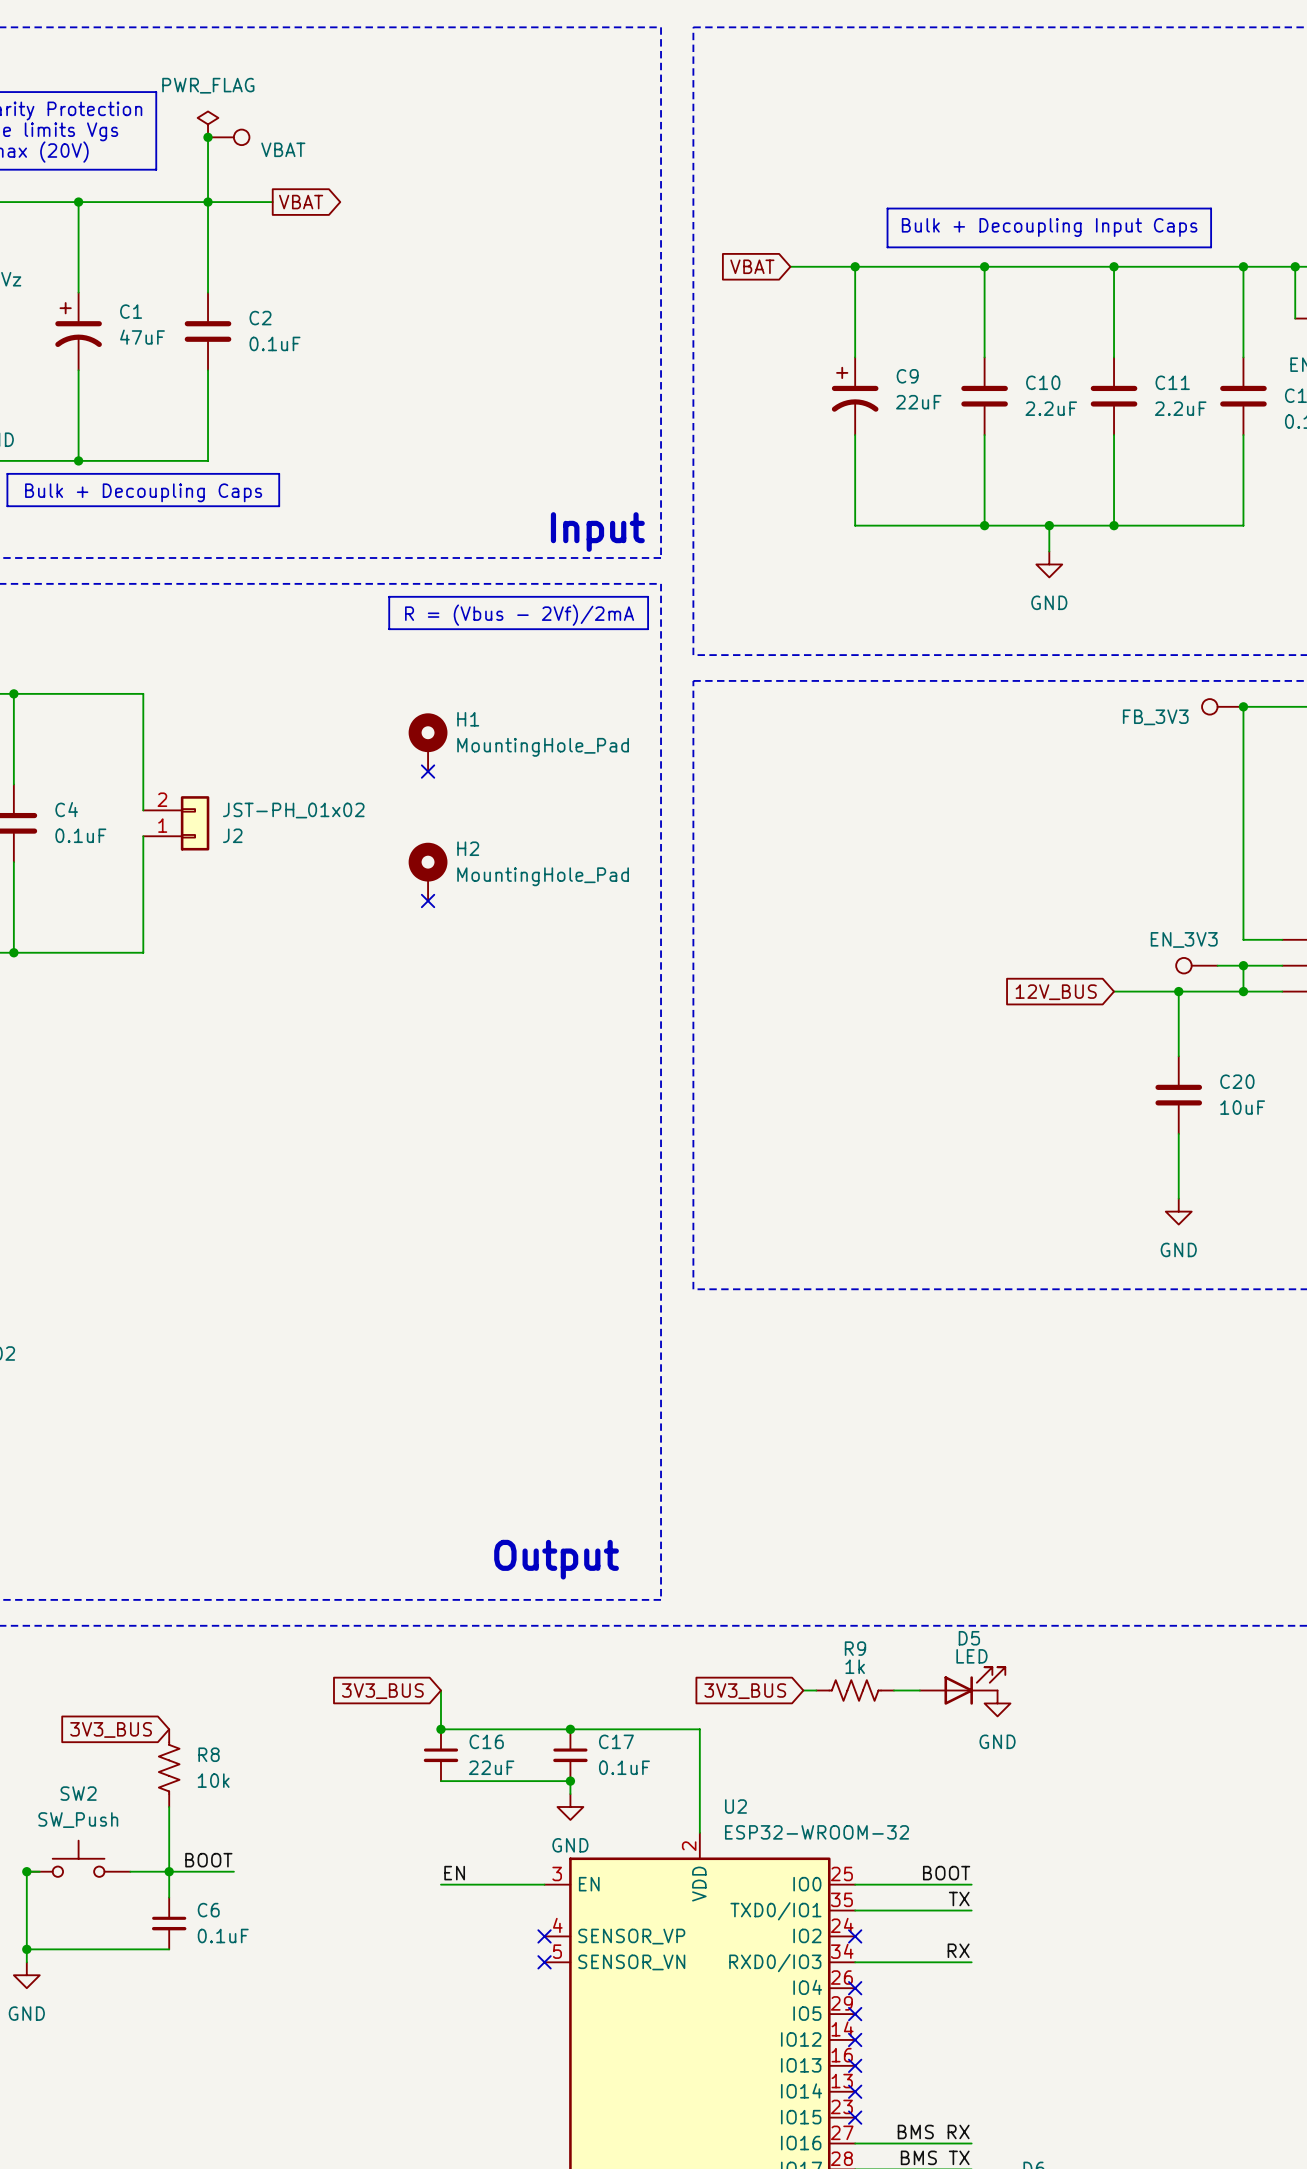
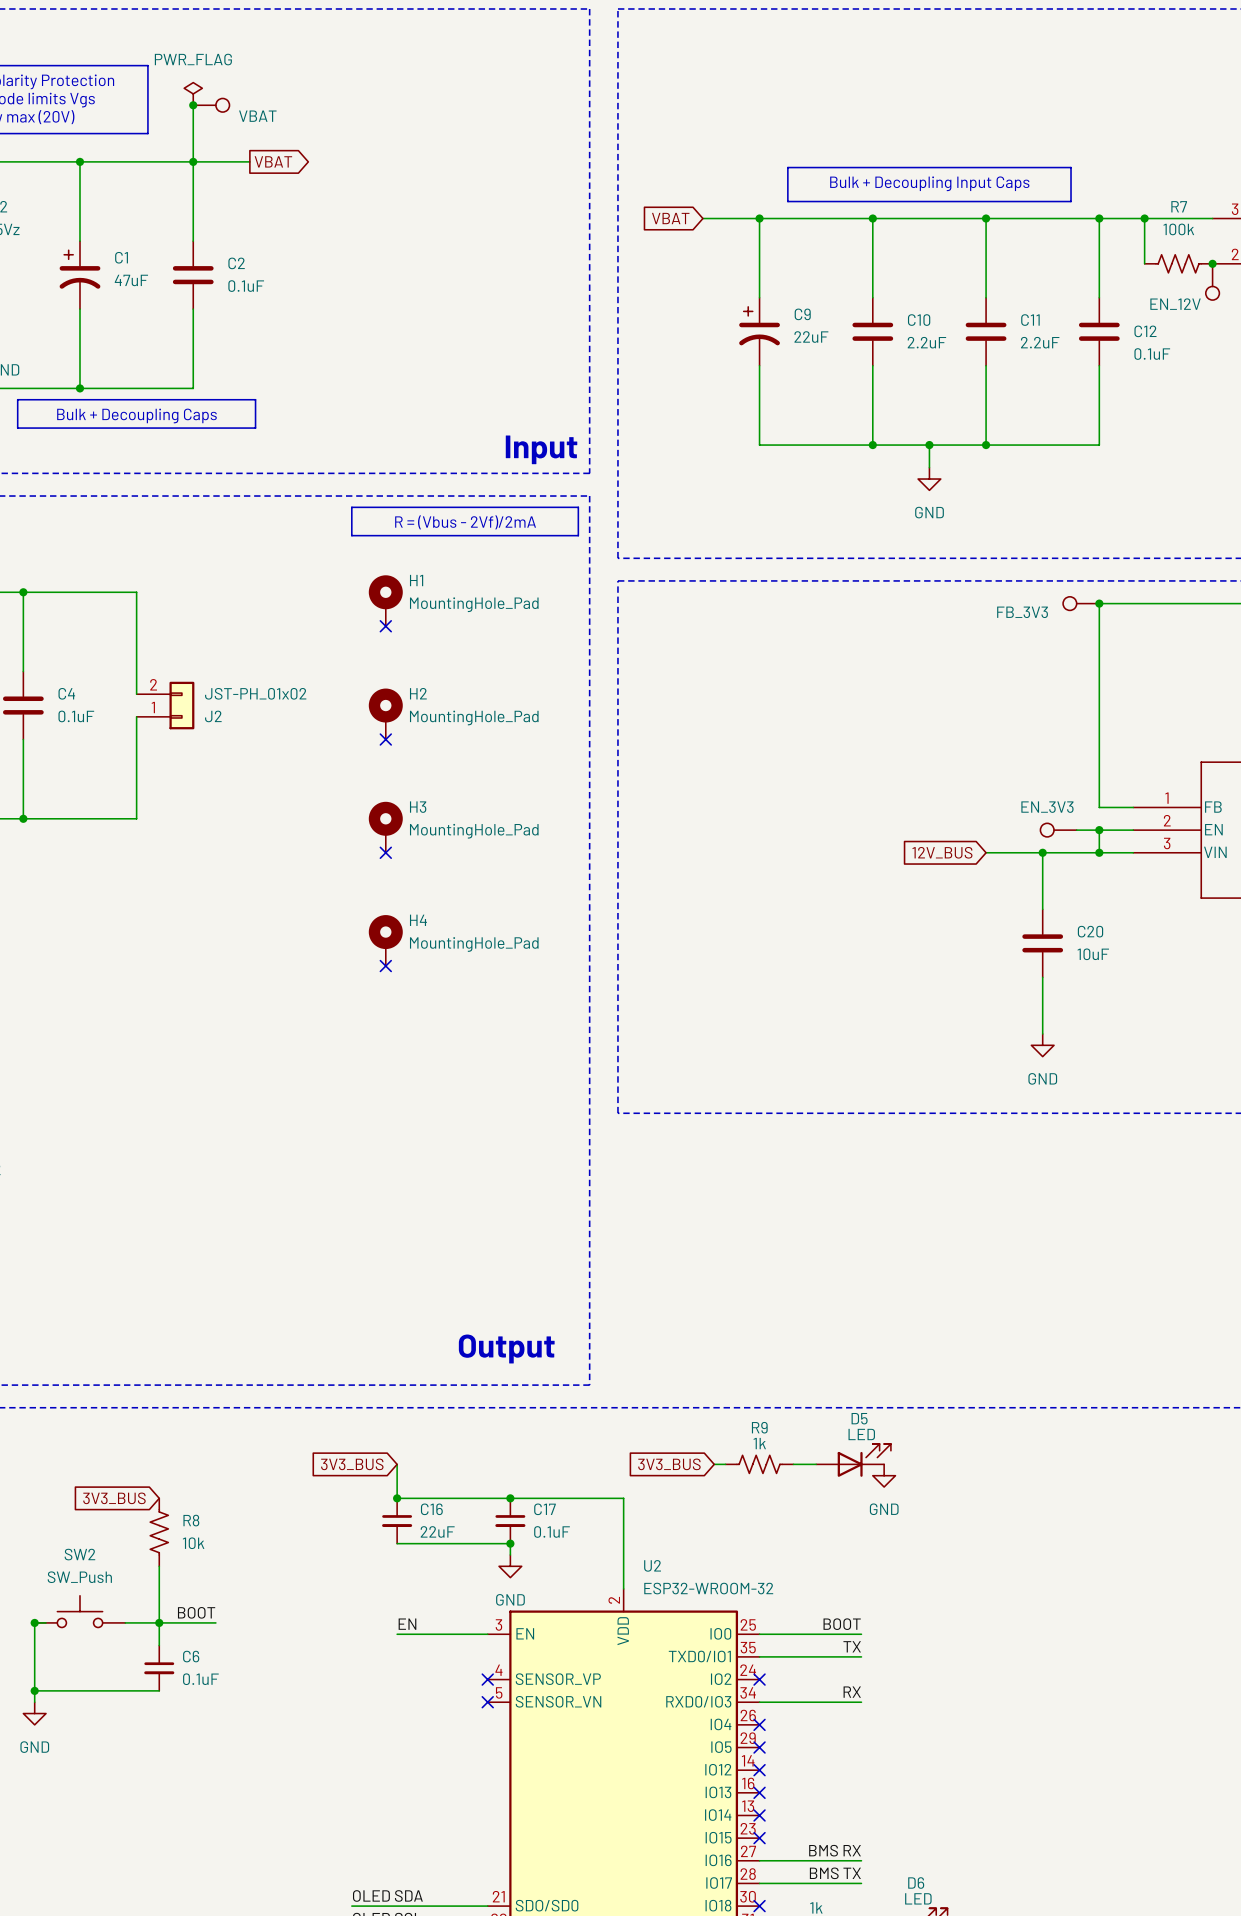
H1 position: (428, 742) -> (385, 600)
no-connect mark position: (428, 771) -> (385, 626)
H2 position: (428, 871) -> (385, 714)
no-connect mark position: (428, 900) -> (385, 739)
H3: none -> MountingHole_Pad (385, 827)
no-connect mark: none -> (385, 852)
H4: none -> MountingHole_Pad (385, 940)
no-connect mark: none -> (385, 966)

